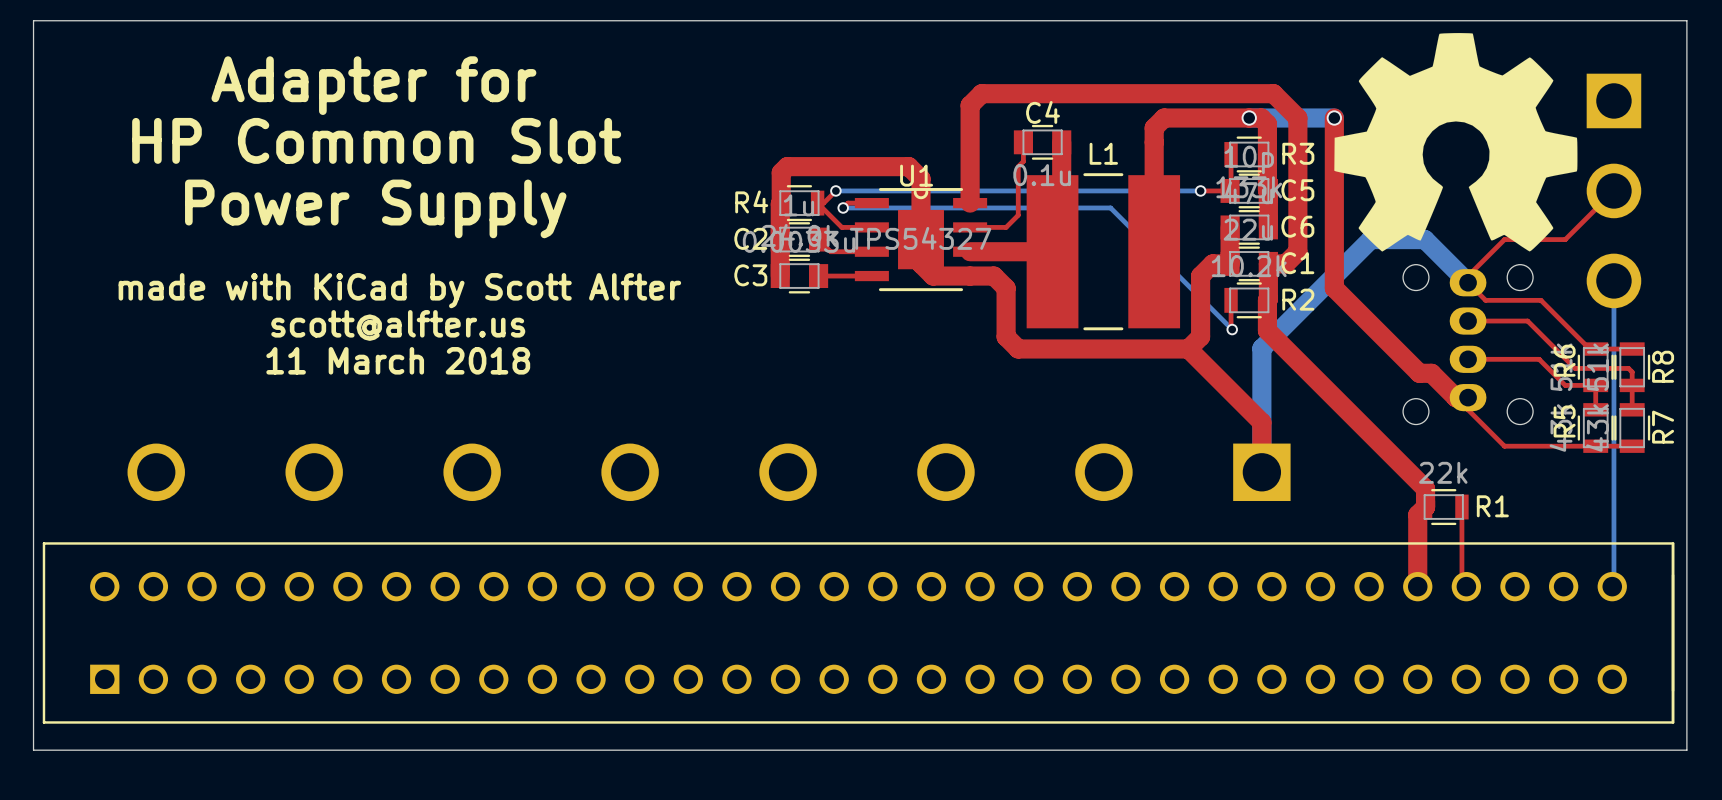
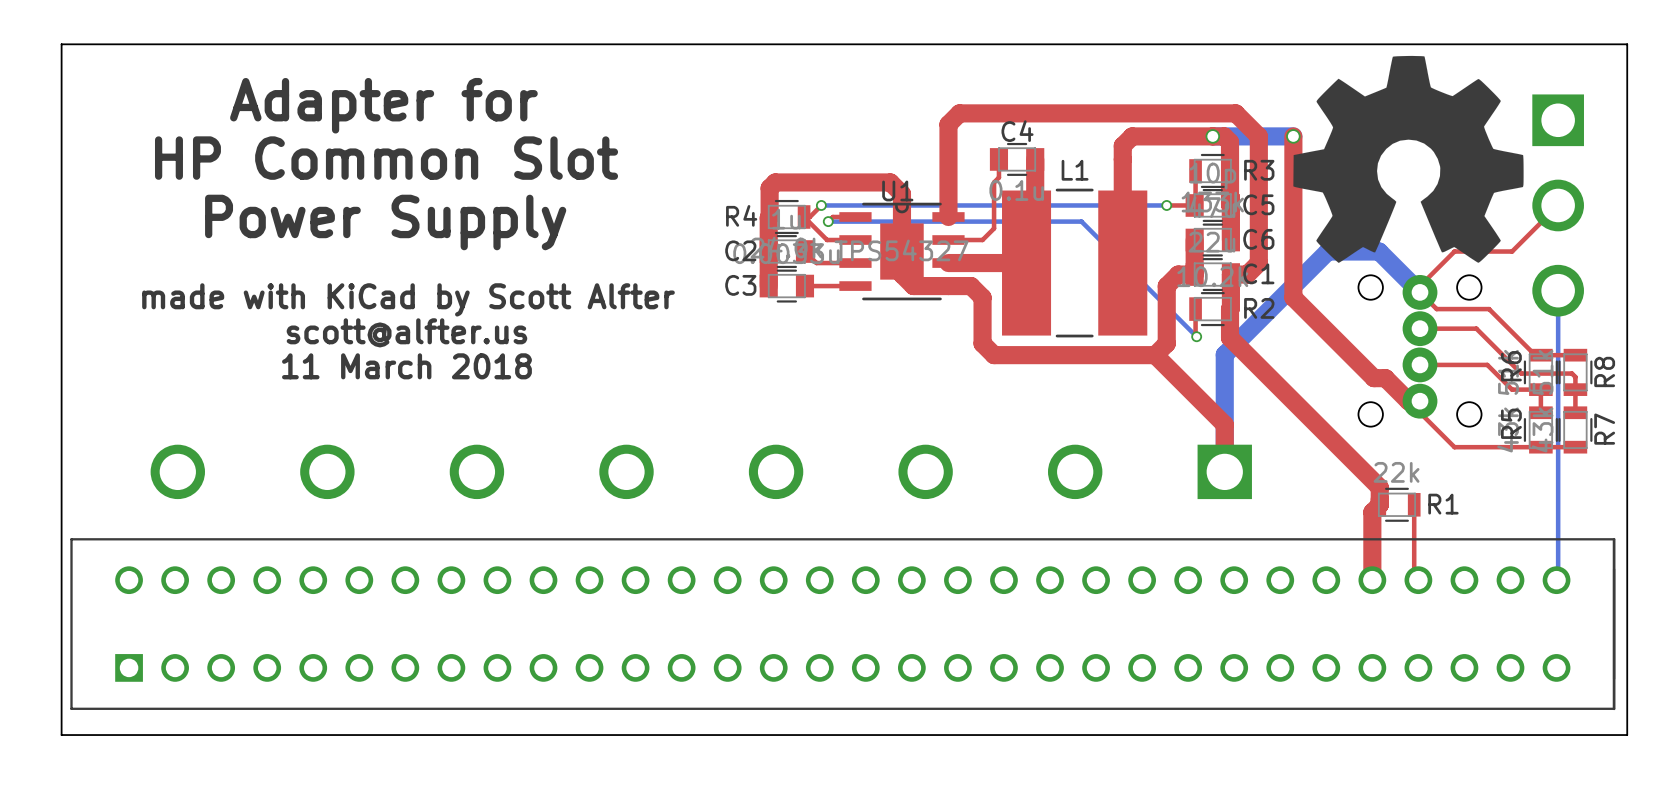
part footprint: [1403, 264, 1534, 425] -> [1358, 275, 1482, 427]

